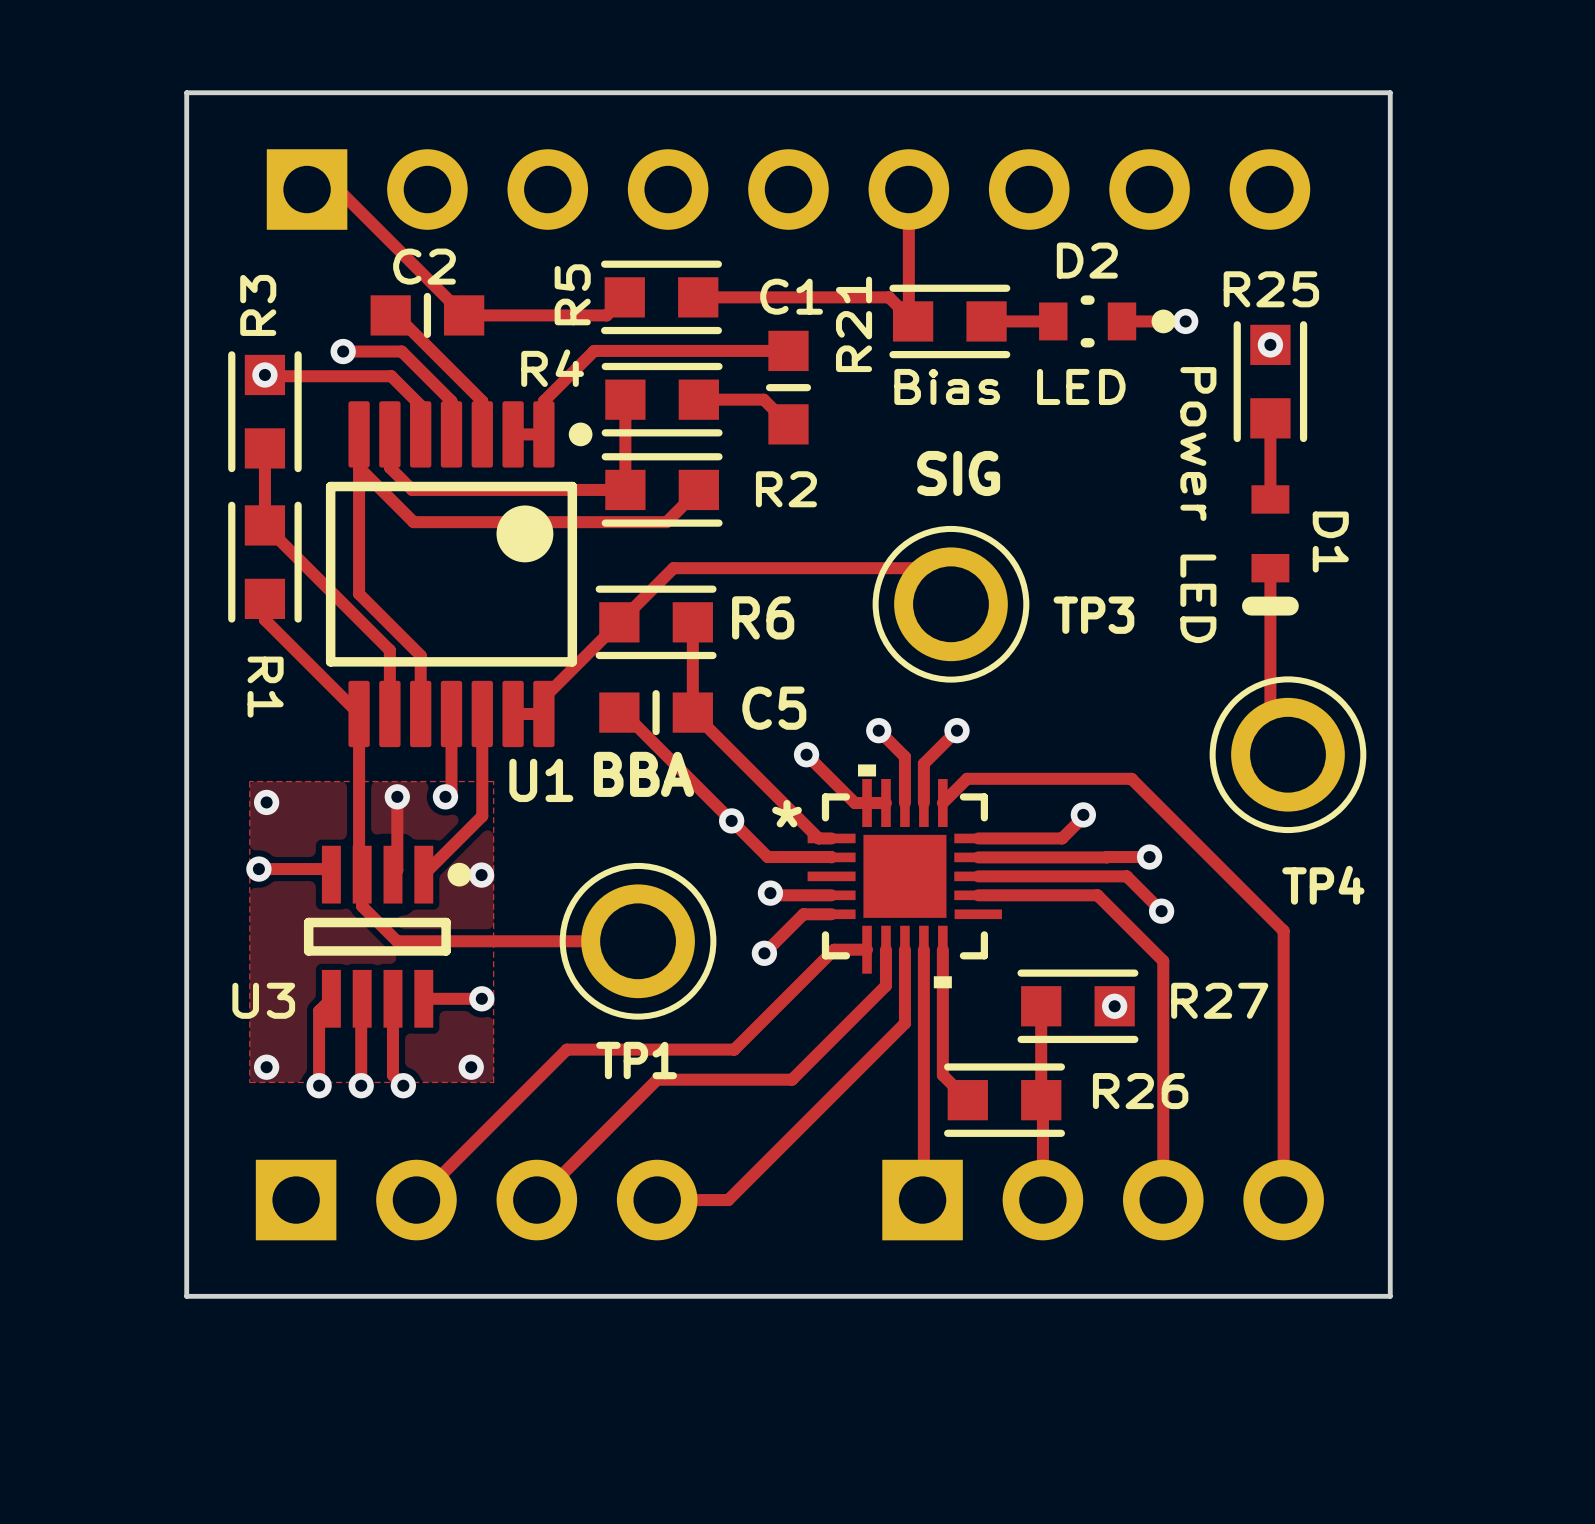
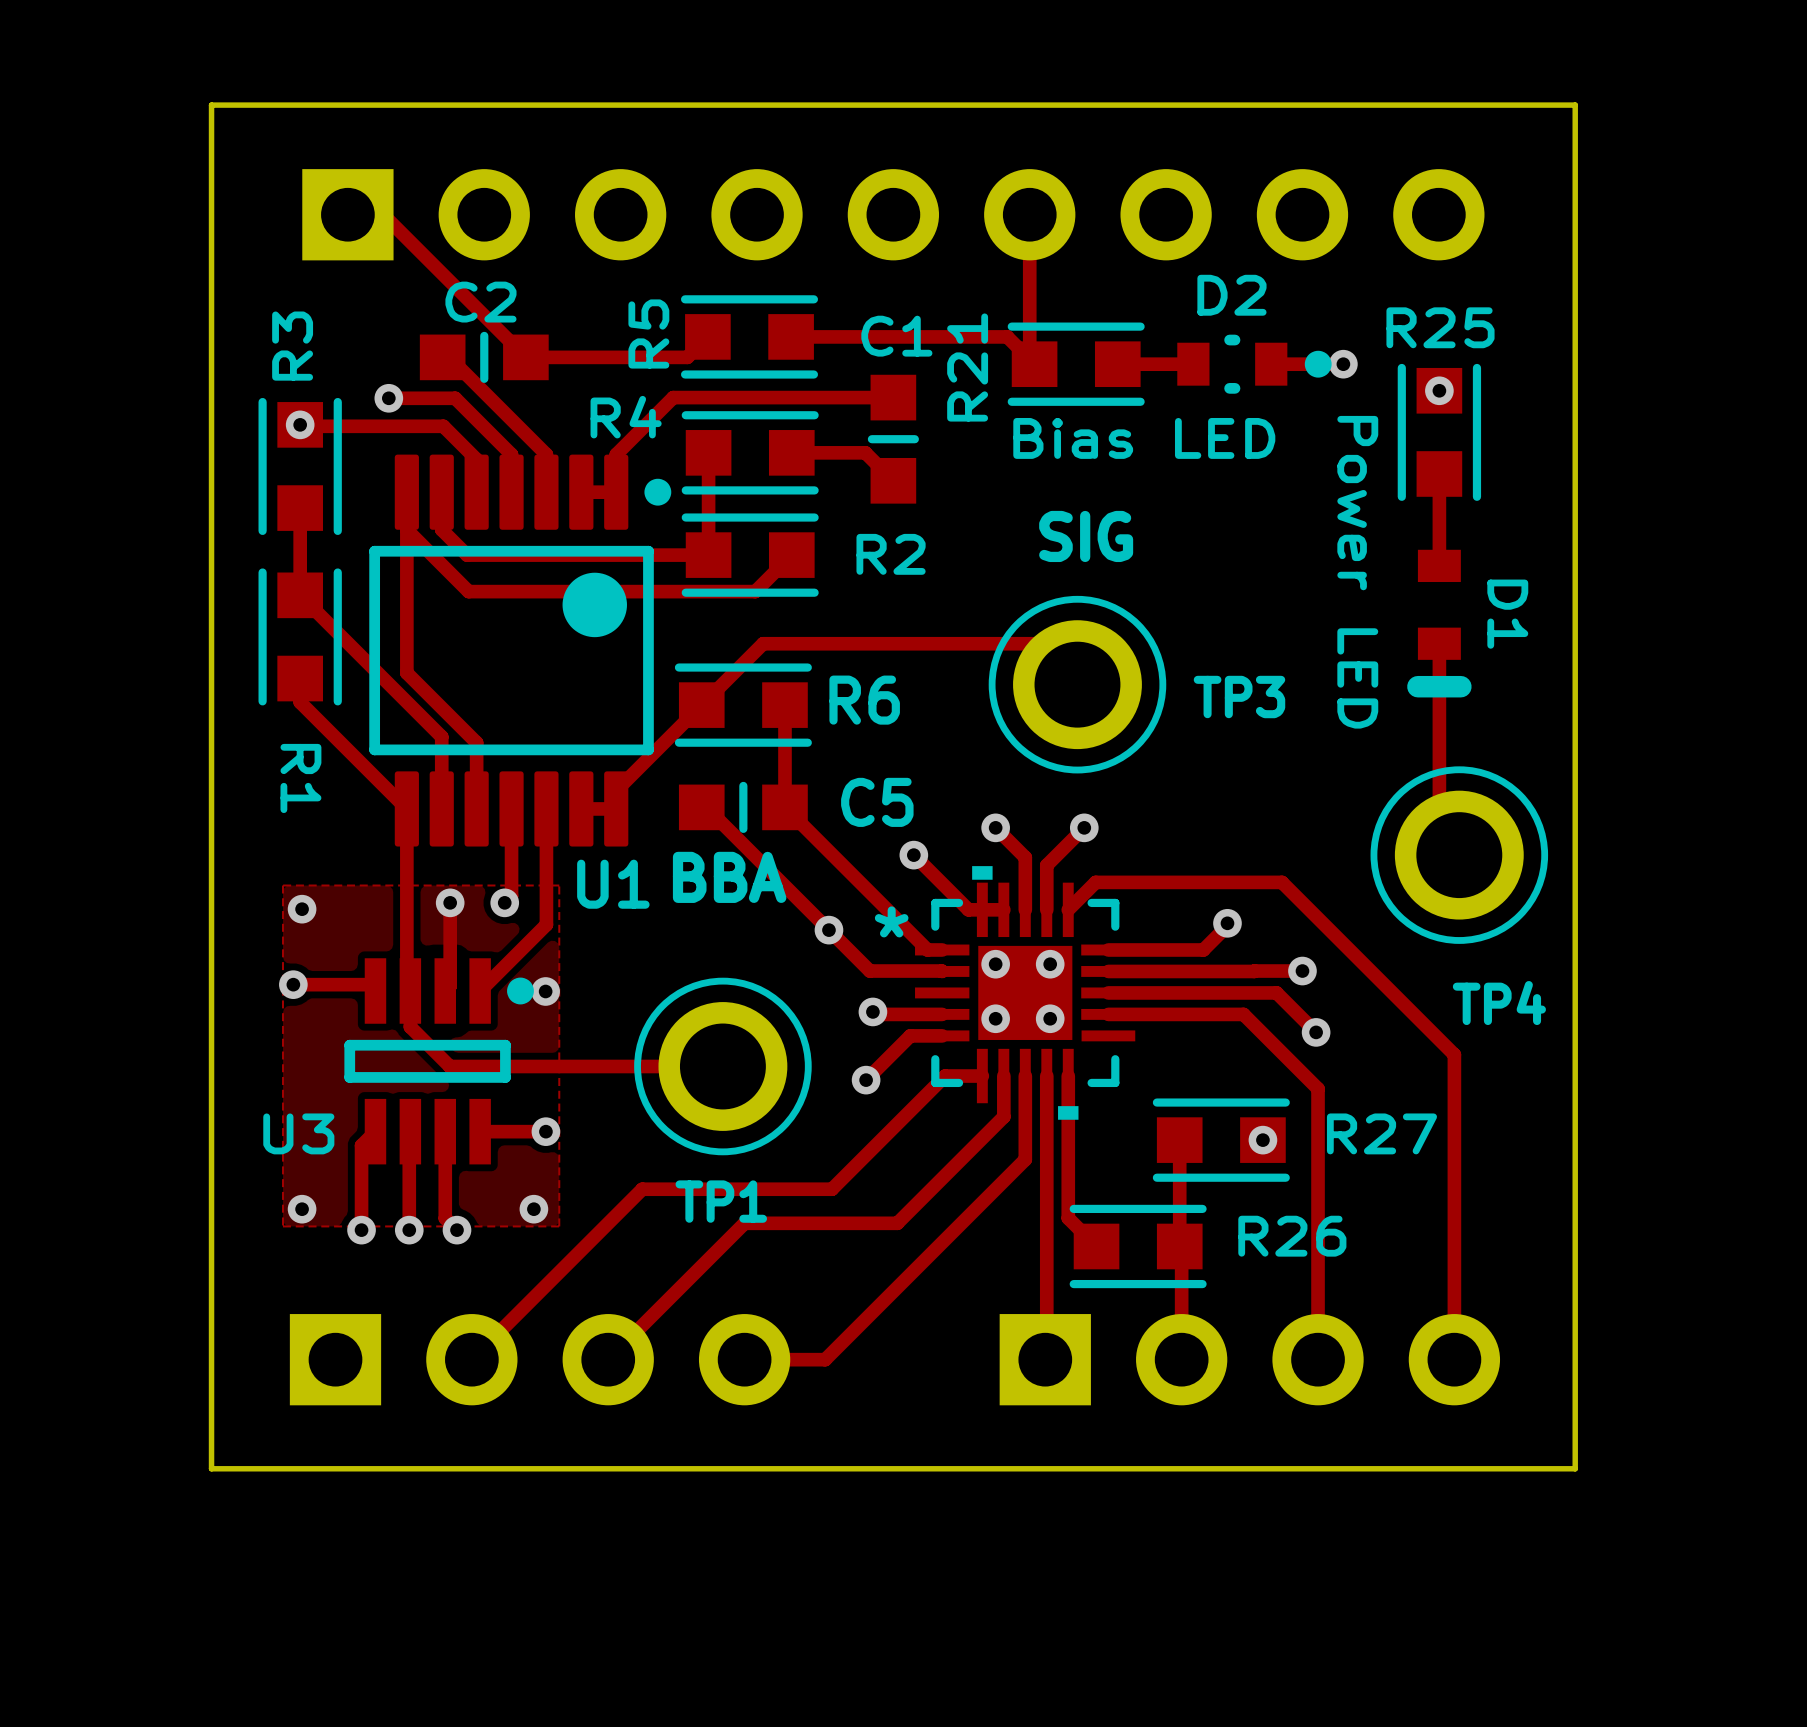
via: none -> (995, 964)
via: none -> (1050, 964)
via: none -> (995, 1018)
via: none -> (1050, 1018)

